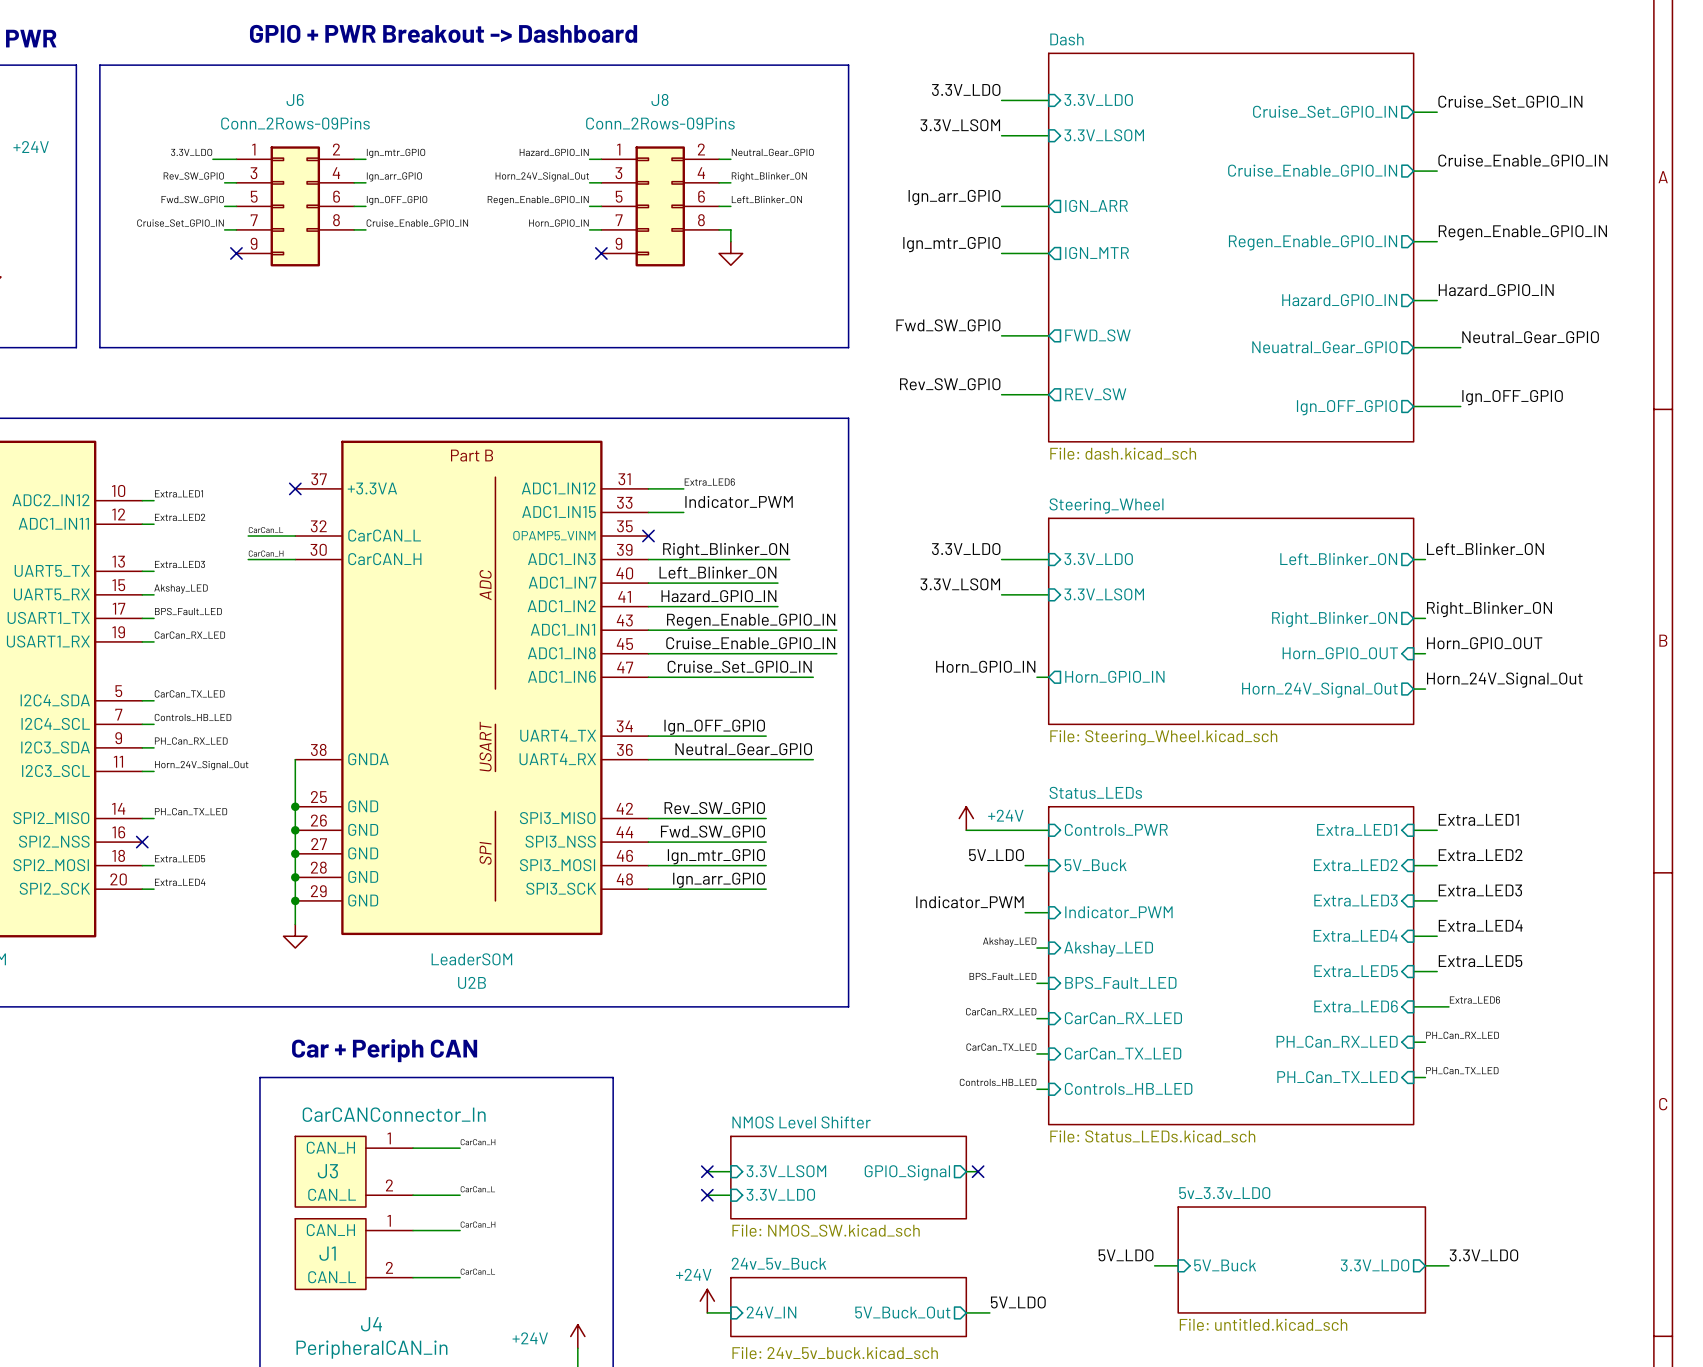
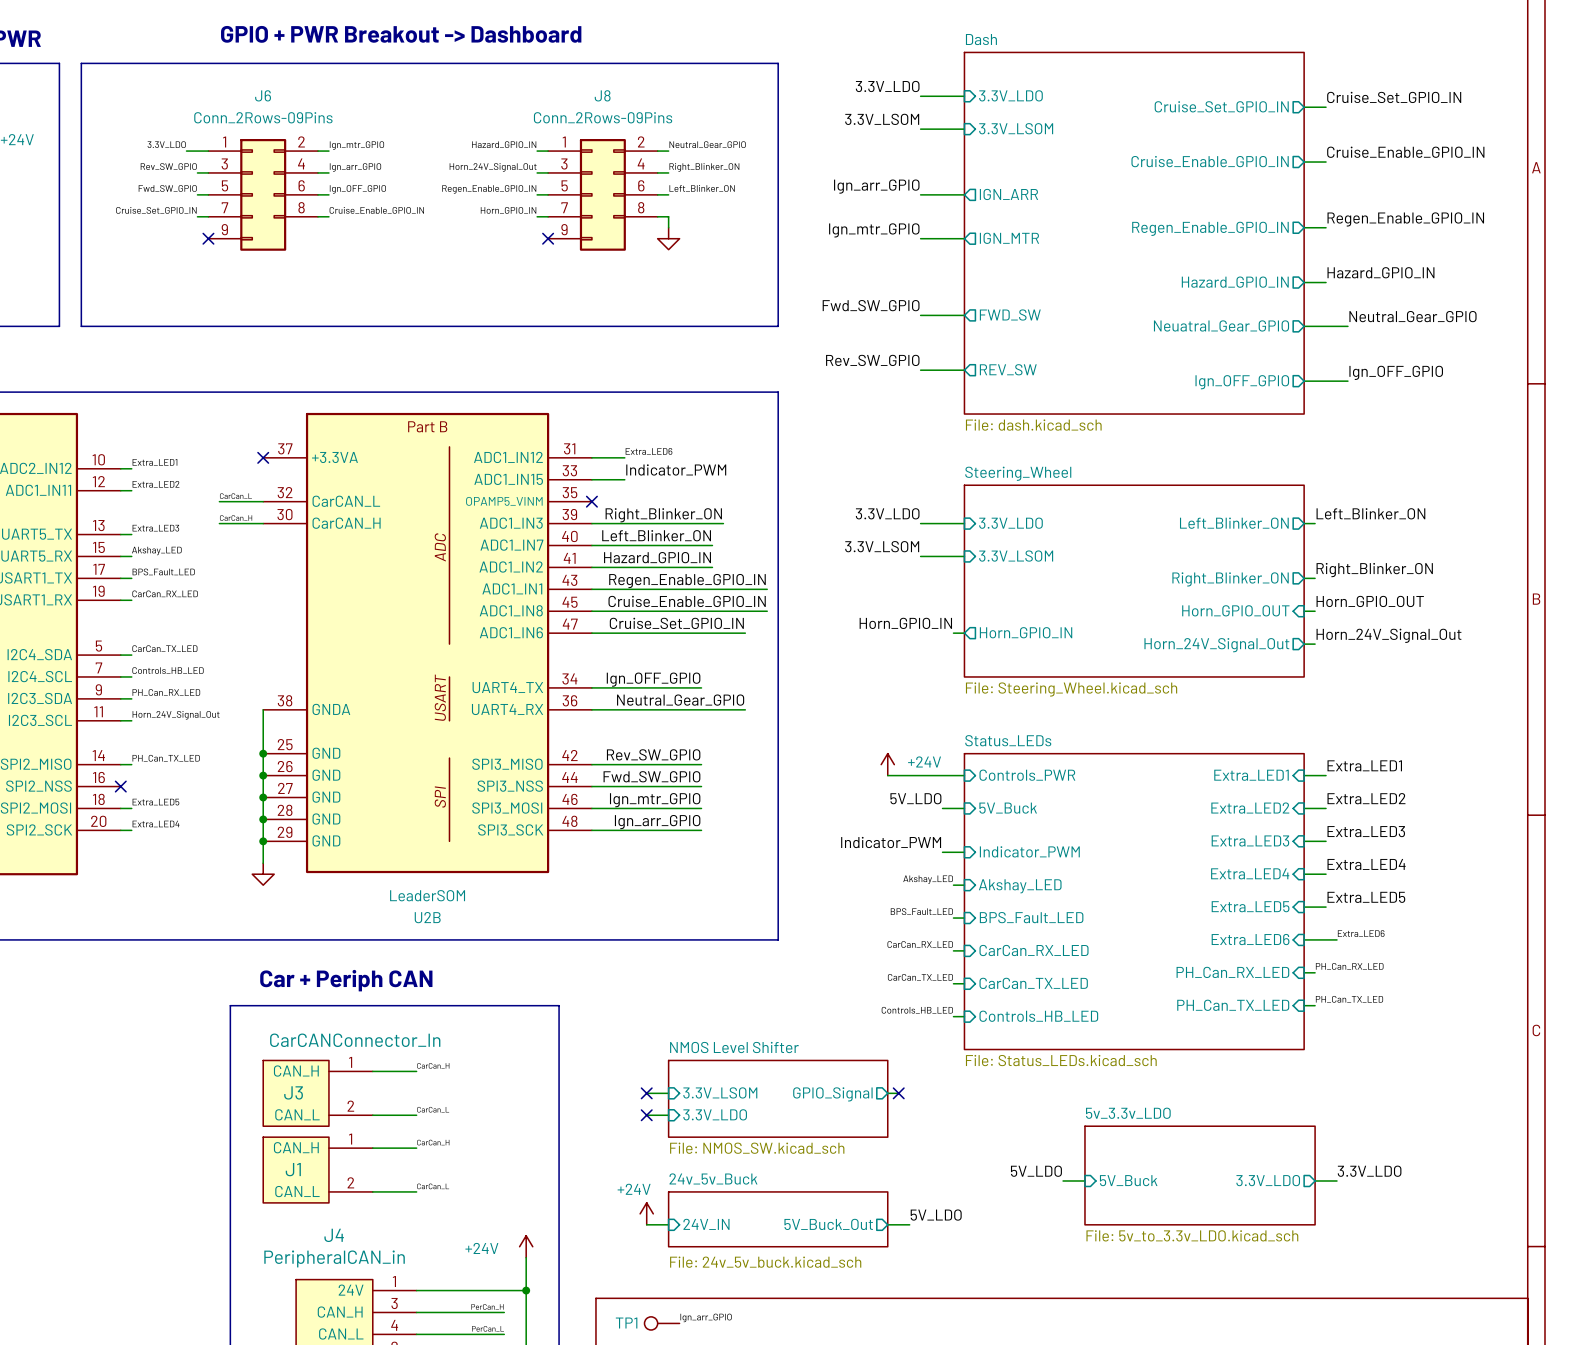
sheet 5v_3.3v_LDO value: File: untitled.kicad_sch (1263, 1324) -> File: 5v_to_3.3v_LDO.kicad_sch (1192, 1235)

